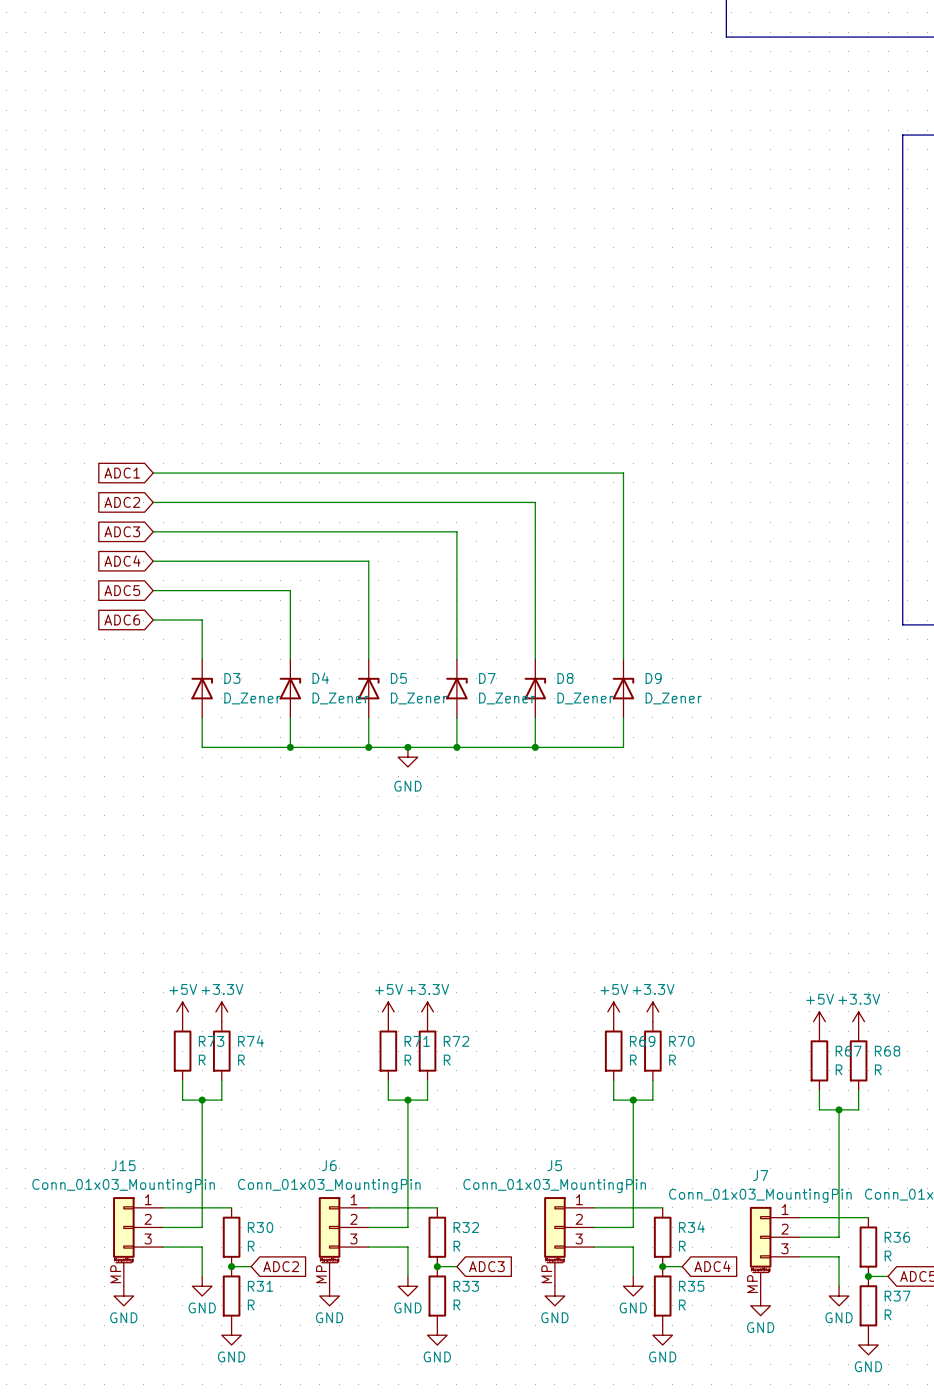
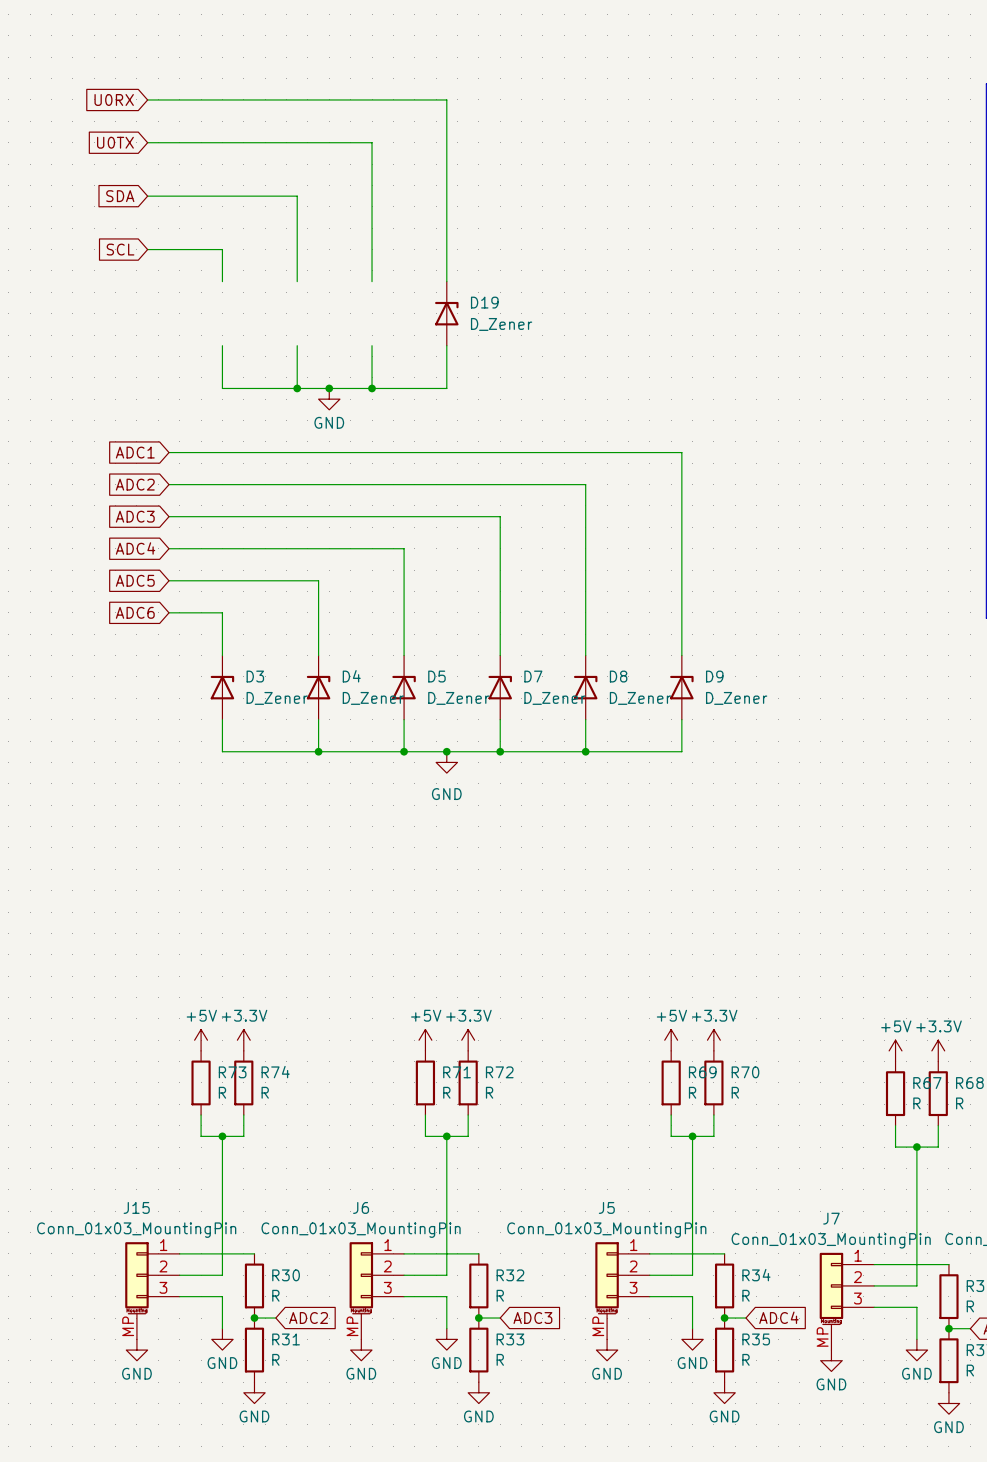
global label: none -> U0RX (114, 99)
wire: none -> (147, 99) (446, 99) (446, 281)
global label: none -> U0TX (115, 142)
wire: none -> (147, 142) (372, 142) (372, 281)
global label: none -> SDA (120, 196)
wire: none -> (147, 196) (297, 196) (297, 281)
global label: none -> SCL (120, 249)
wire: none -> (147, 249) (222, 249) (222, 281)
D19: none -> D_Zener (446, 313)
wire: none -> (222, 345) (222, 388) (446, 388) (446, 345)
wire: none -> (297, 345) (297, 388)
wire: none -> (372, 345) (372, 388)
junction: none -> (297, 388)
junction: none -> (329, 388)
junction: none -> (372, 388)
power symbol: none -> GND (329, 399)

